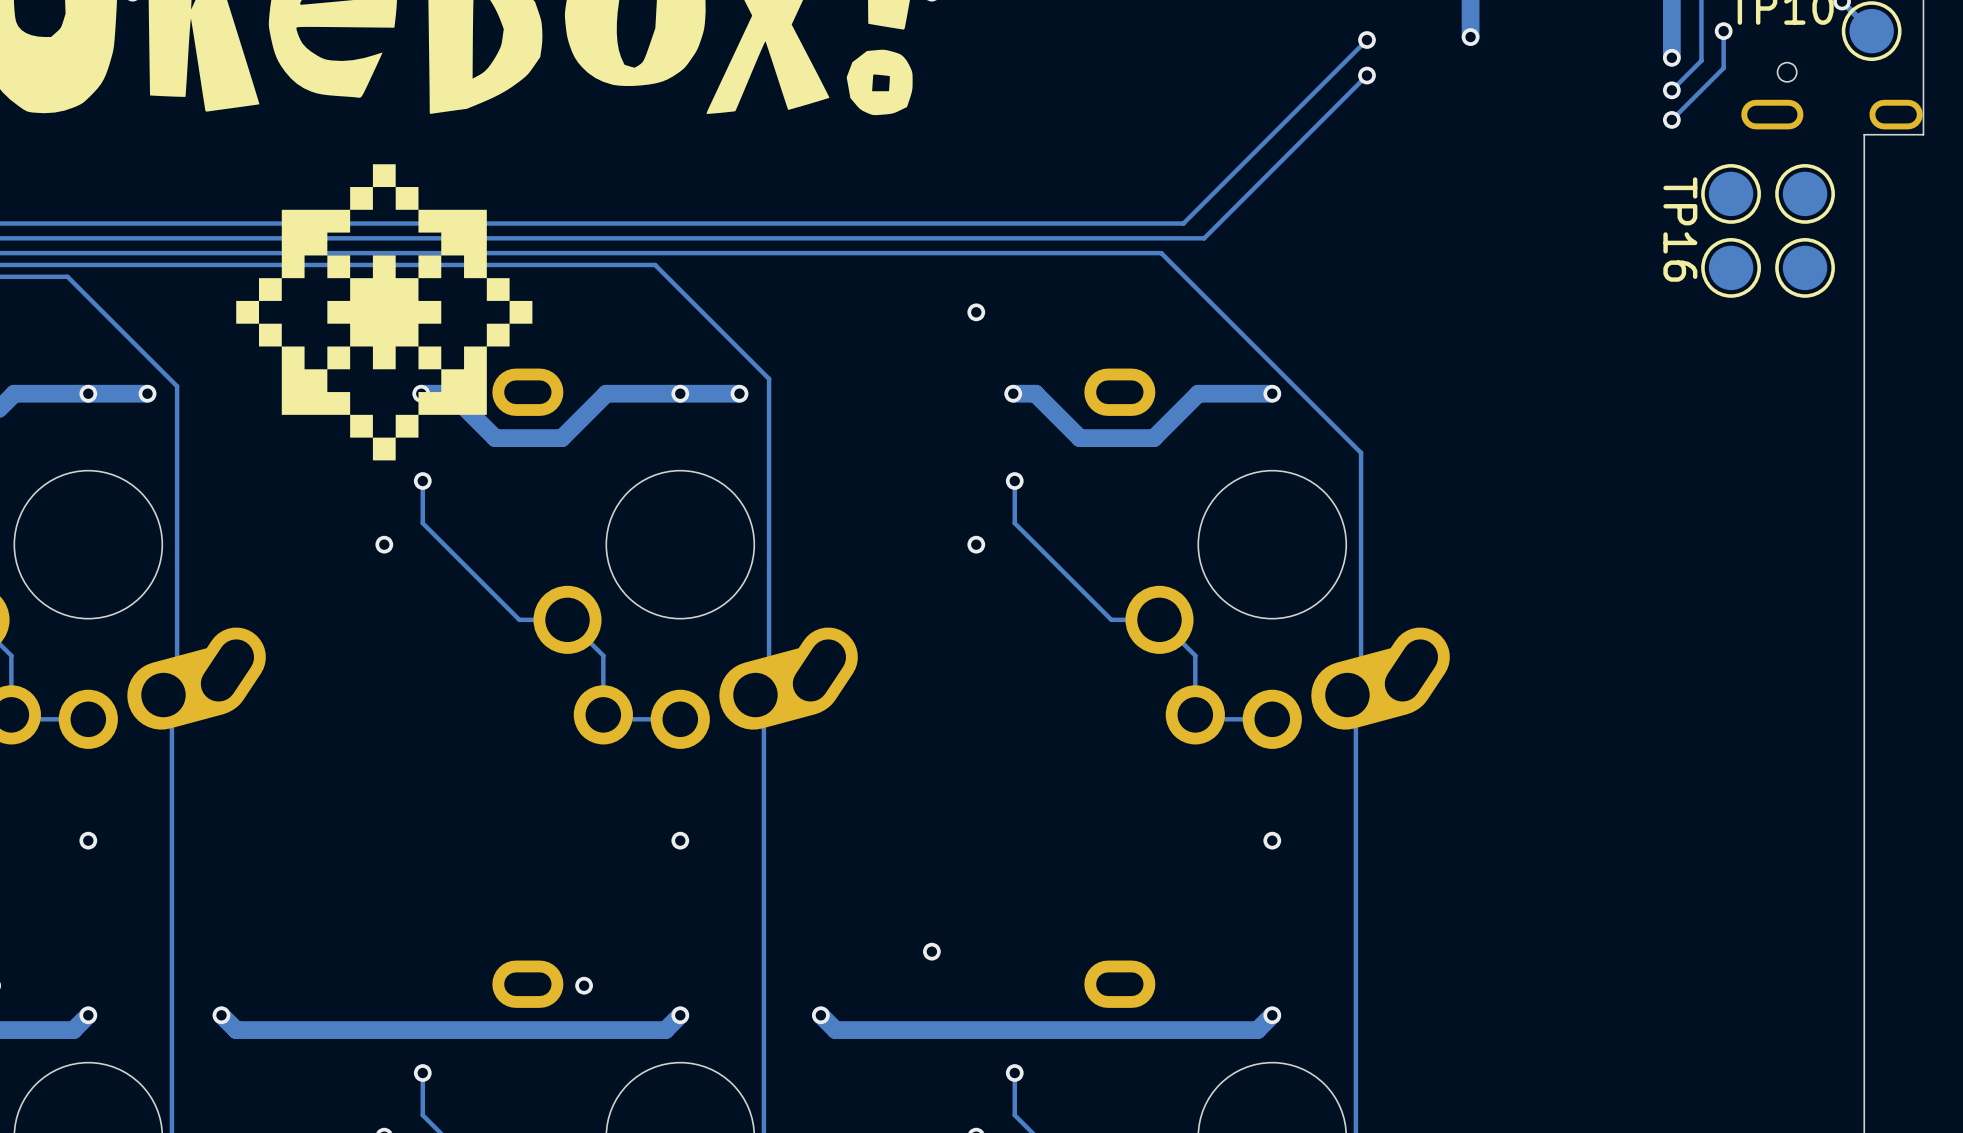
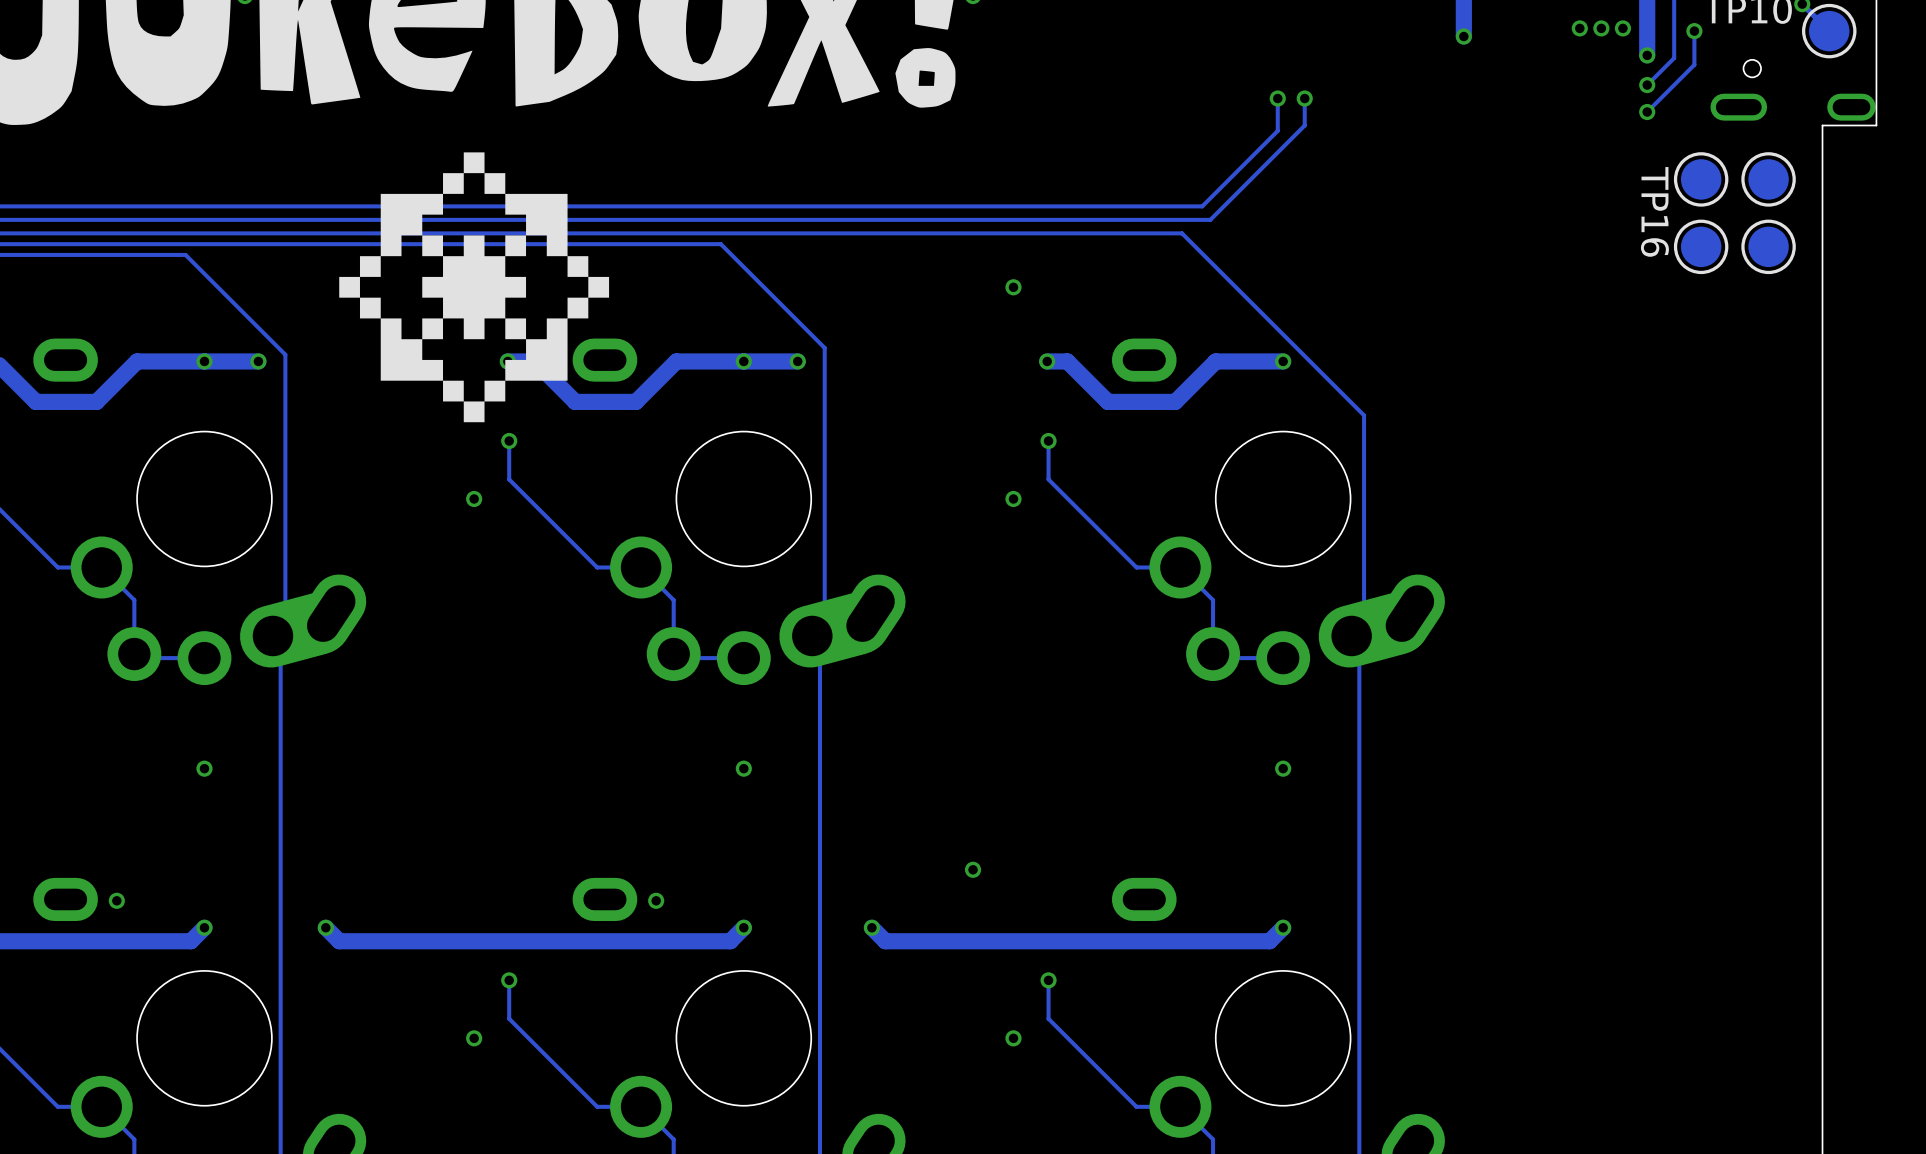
via: none -> (1579, 28)
via: none -> (1601, 28)
via: none -> (1622, 28)
track: (1366, 40) (1266, 140) -> (1277, 98) (1277, 130)
via: (1366, 40) -> none
track: (1366, 75) (1204, 238) (1192, 238) -> (1304, 98) (1304, 125) (1210, 219)
via: (1366, 75) -> none
via: none -> (1277, 98)
via: none -> (1304, 98)

